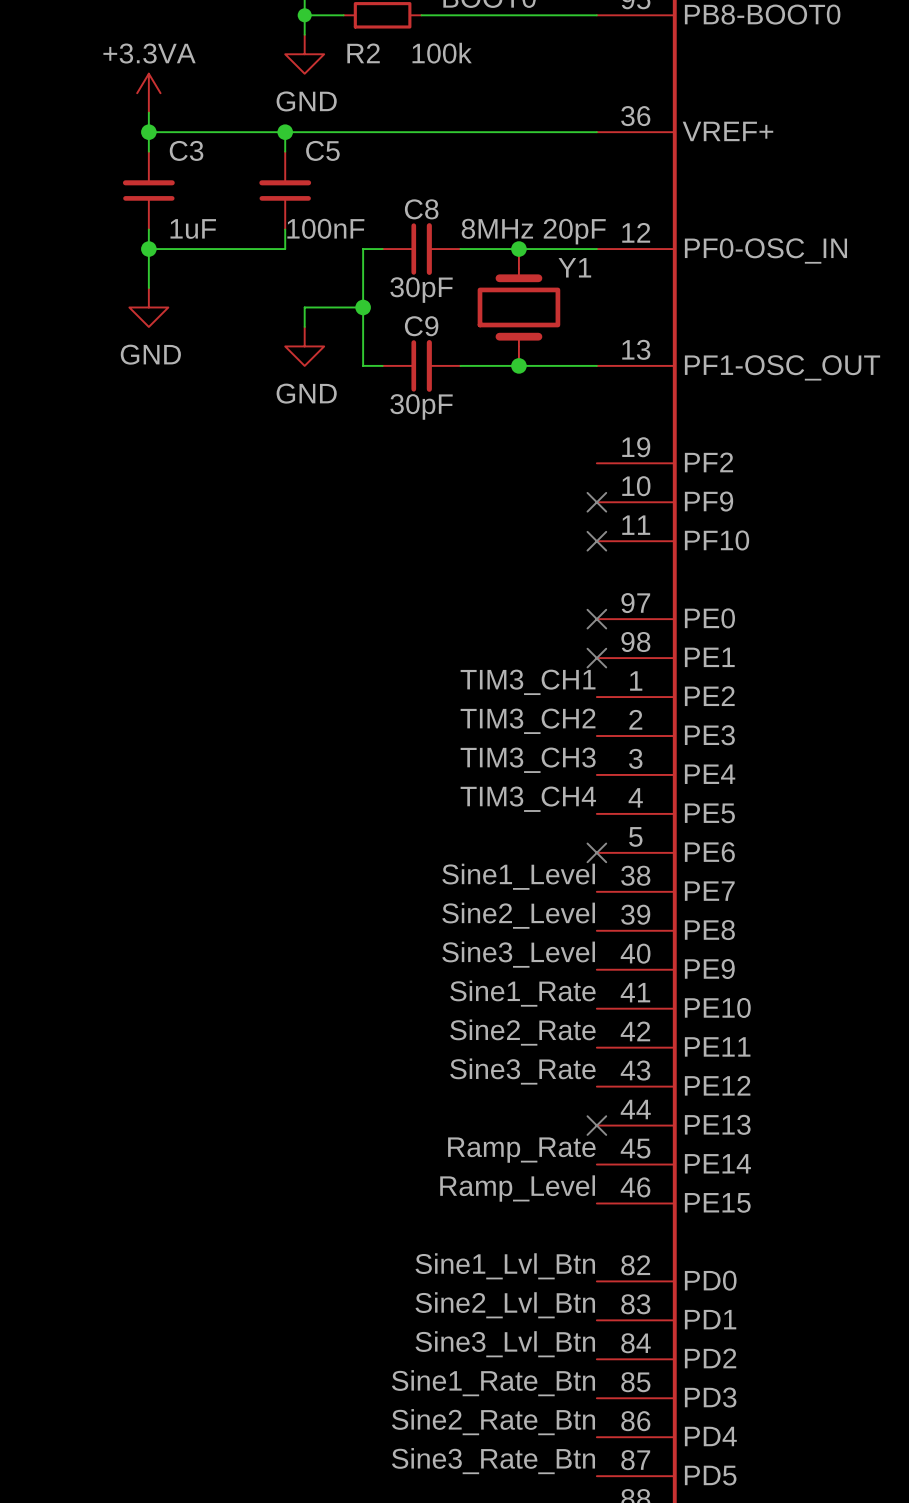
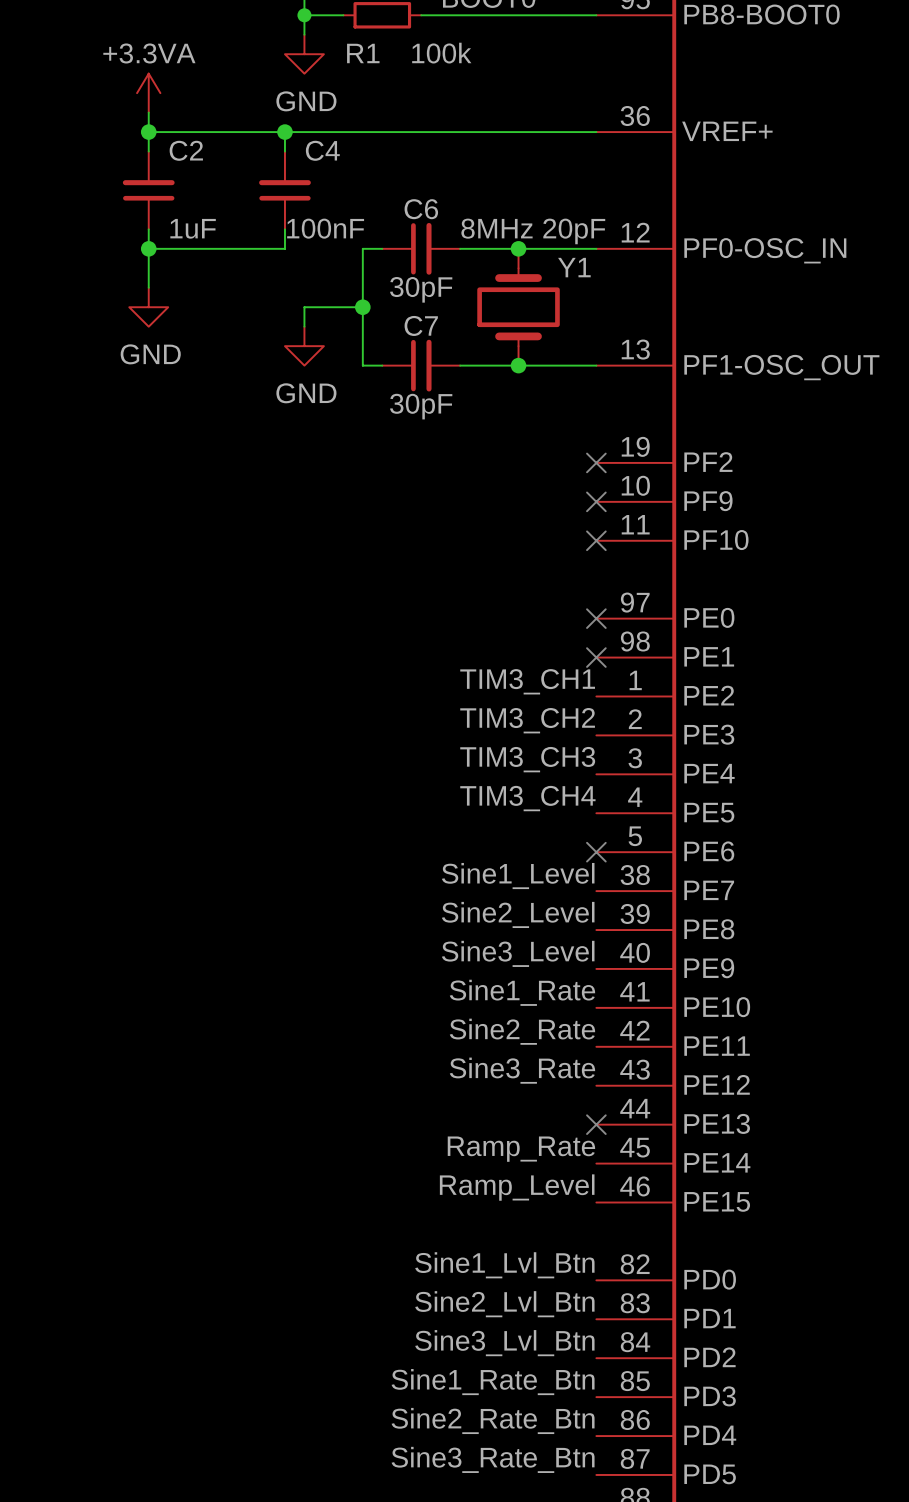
R2 name: R2 (363, 53) -> R1 (363, 53)
C3 name: C3 (186, 150) -> C2 (186, 150)
C5 name: C5 (322, 150) -> C4 (322, 150)
C8 name: C8 (421, 209) -> C6 (421, 209)
C9 name: C9 (421, 326) -> C7 (421, 325)
no-connect mark: none -> (596, 462)

